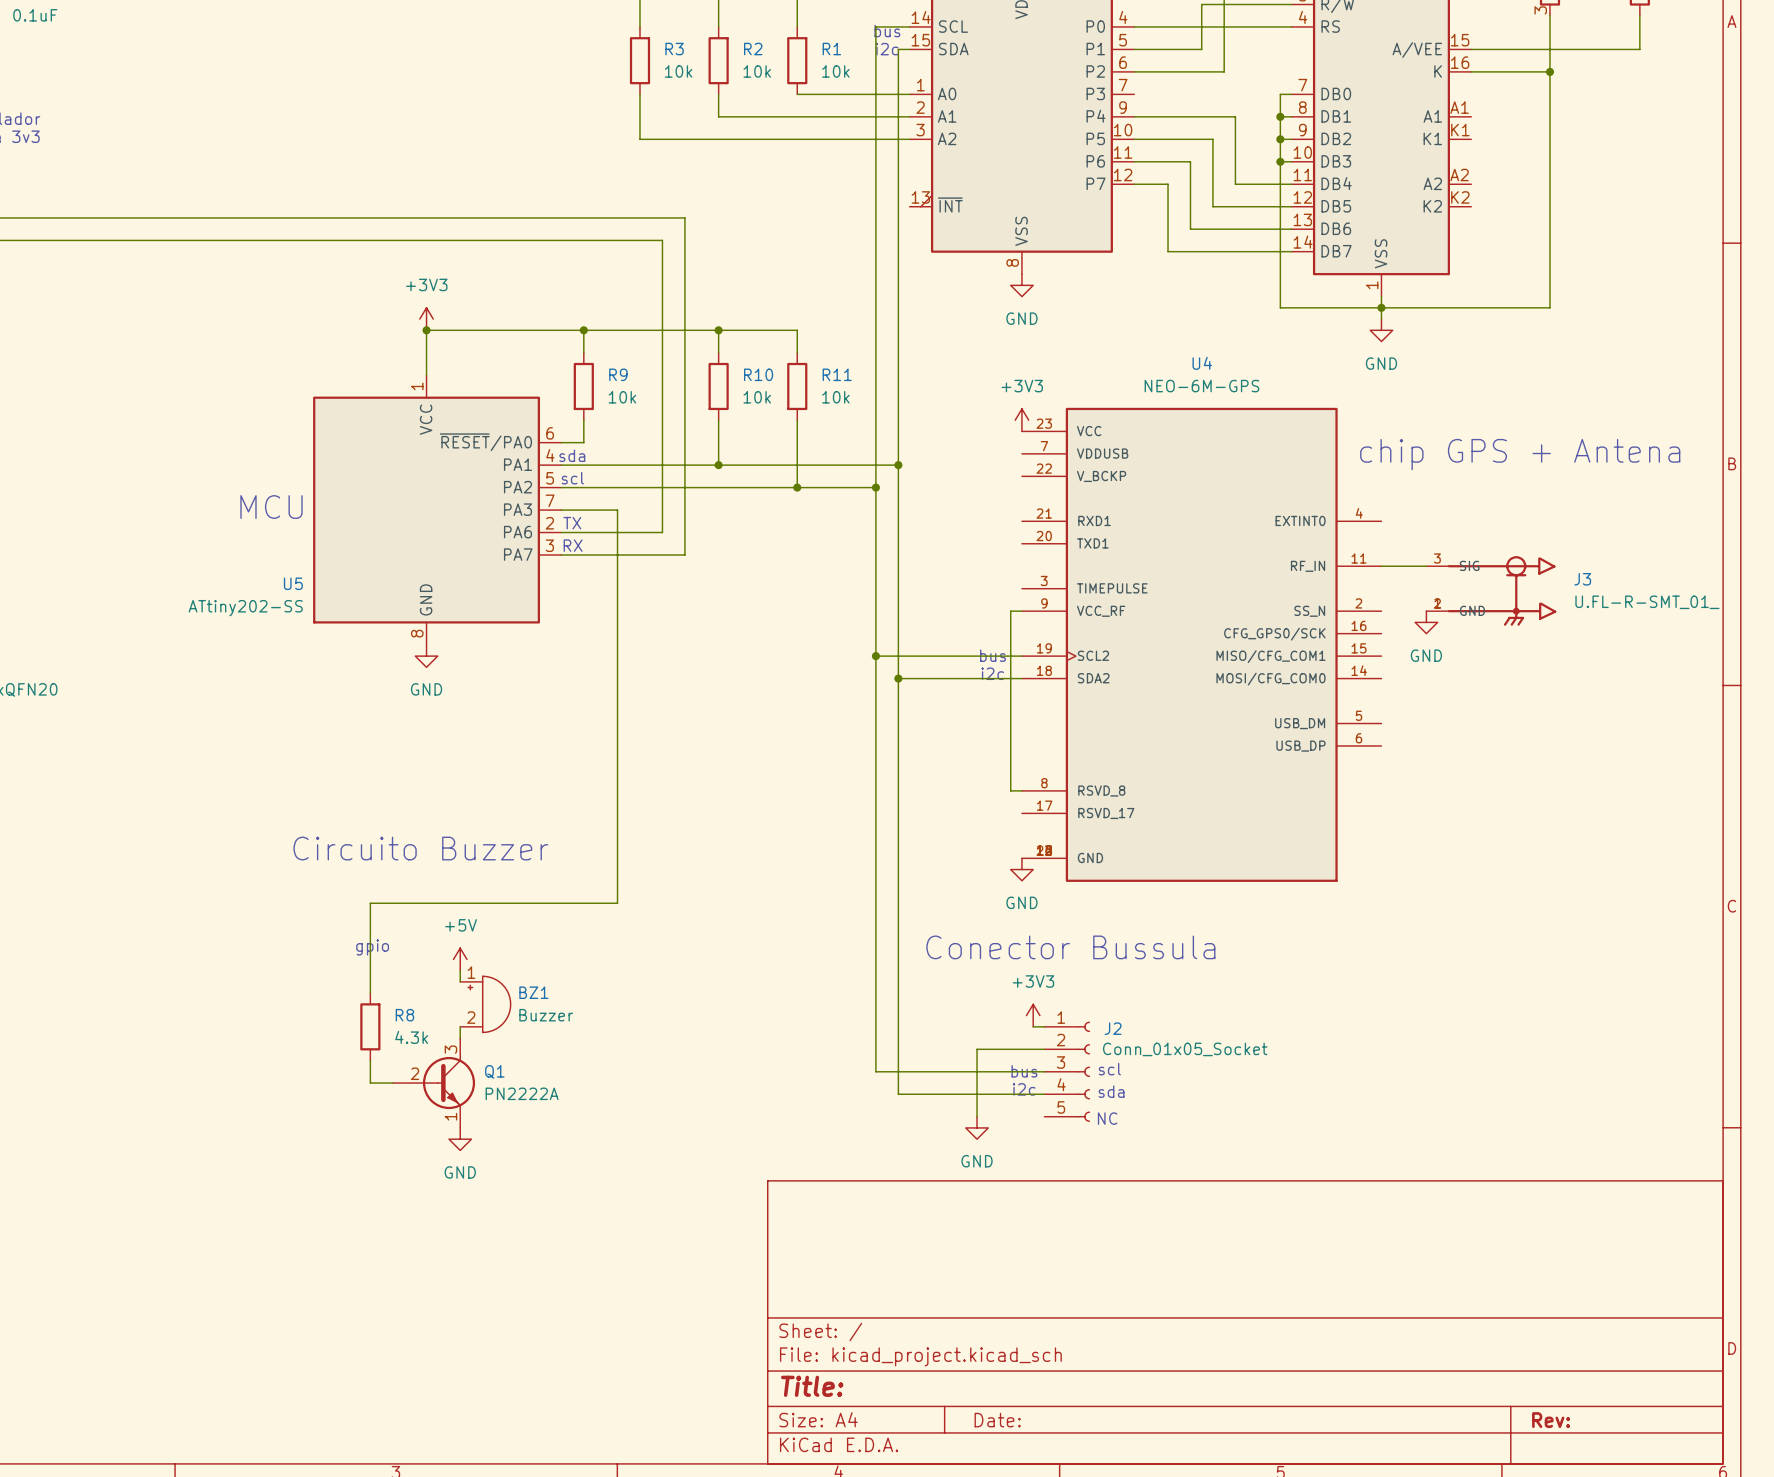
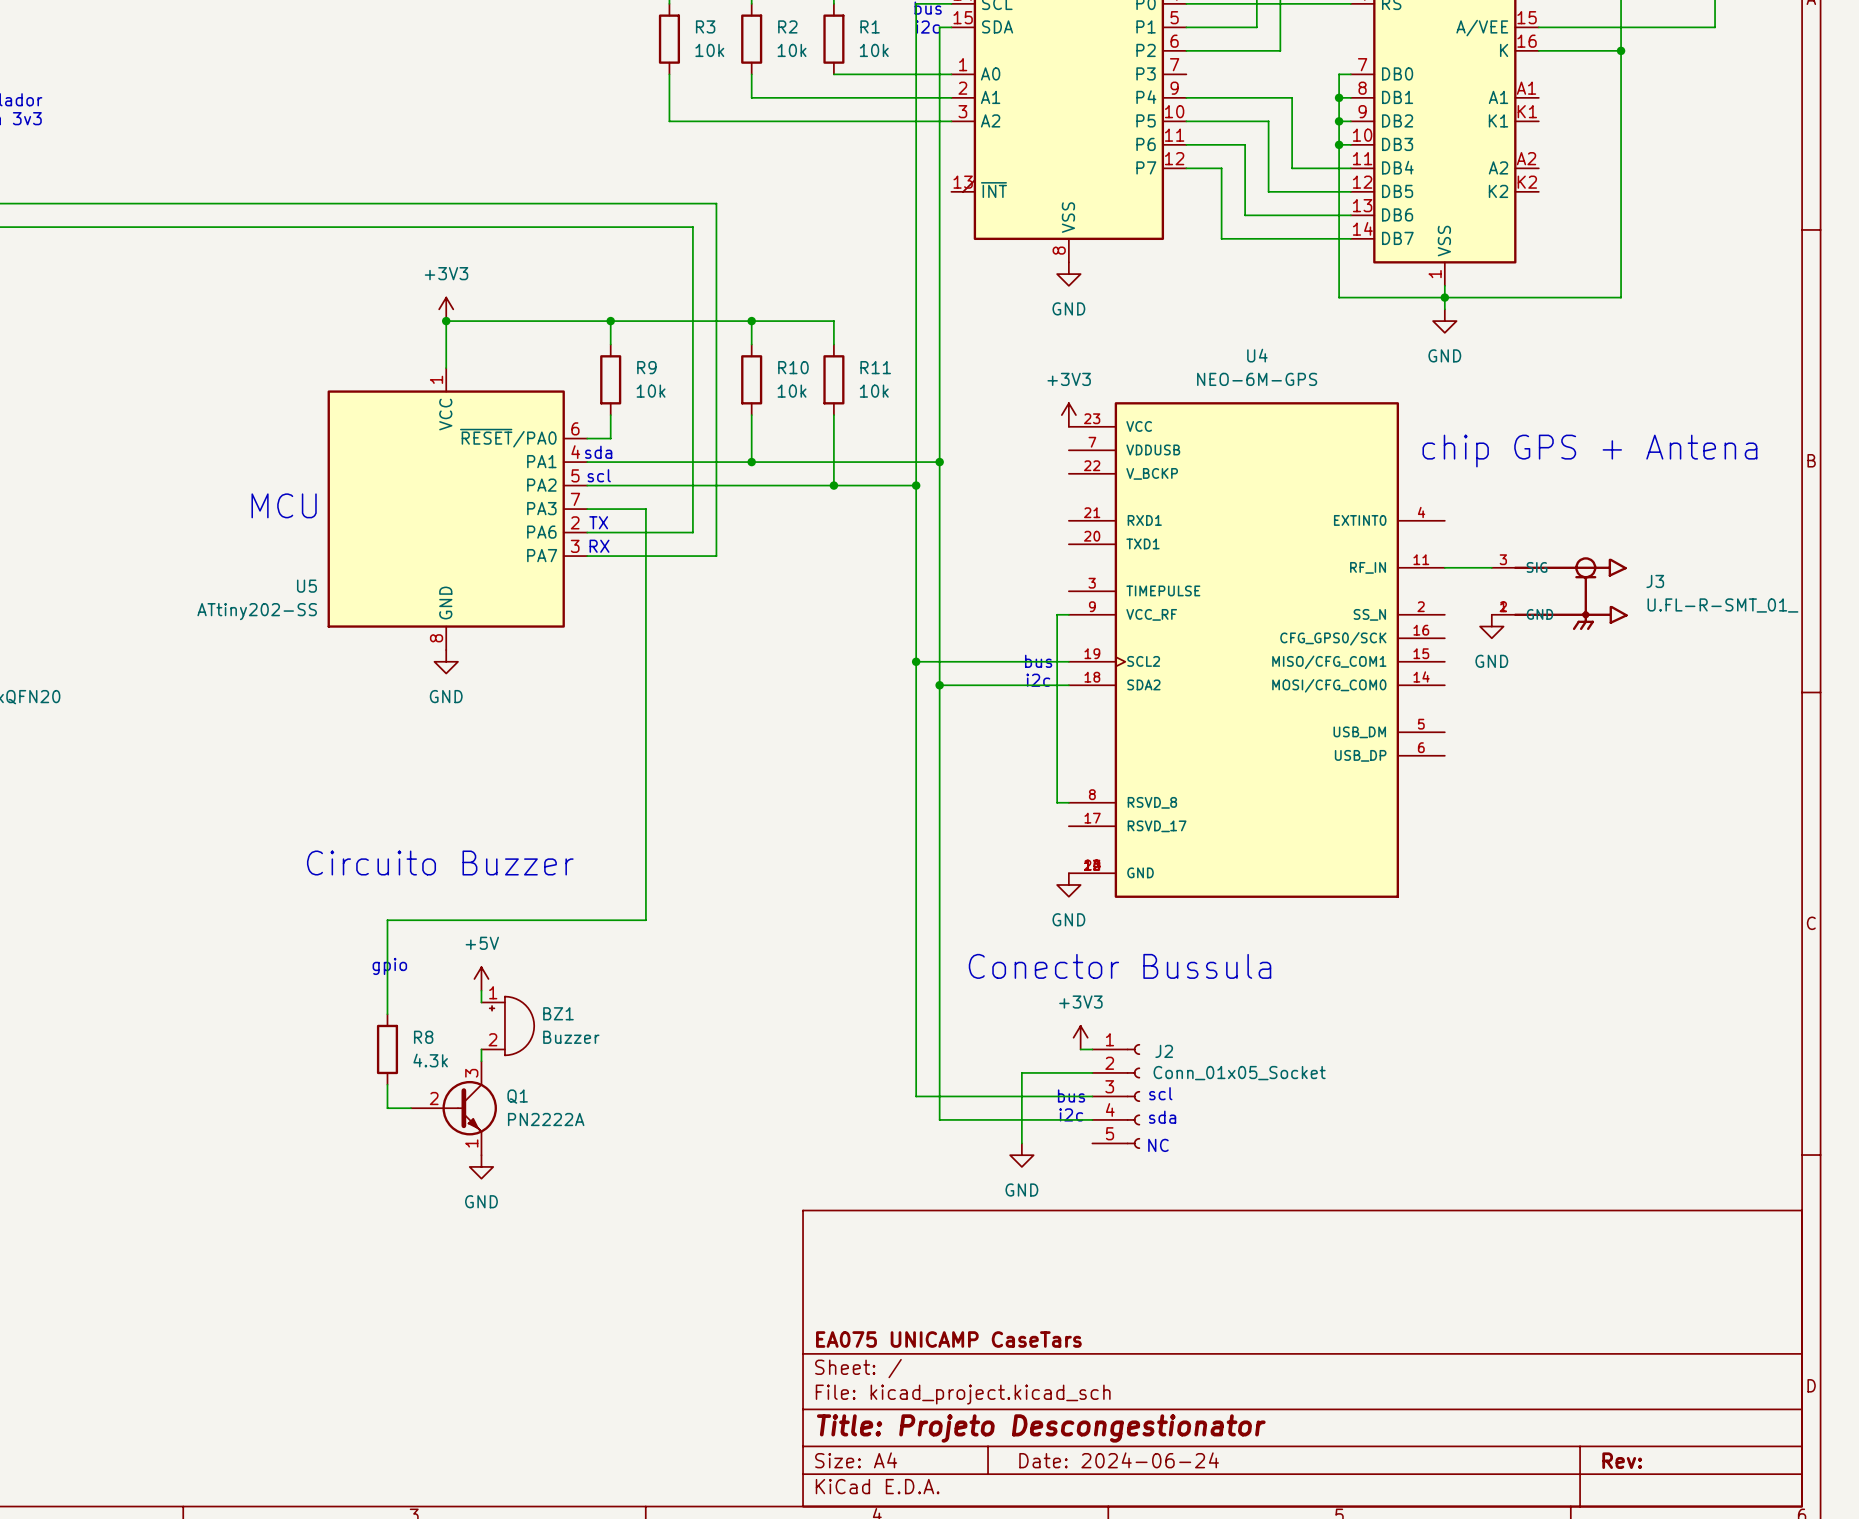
title block: none -> EA075 UNICAMP CaseTars (948, 1339)
title block: Title: (812, 1386) -> Title: Projeto Descongestionator (1041, 1428)
title block: Date: (997, 1420) -> Date: 2024-06-24 (1119, 1460)

